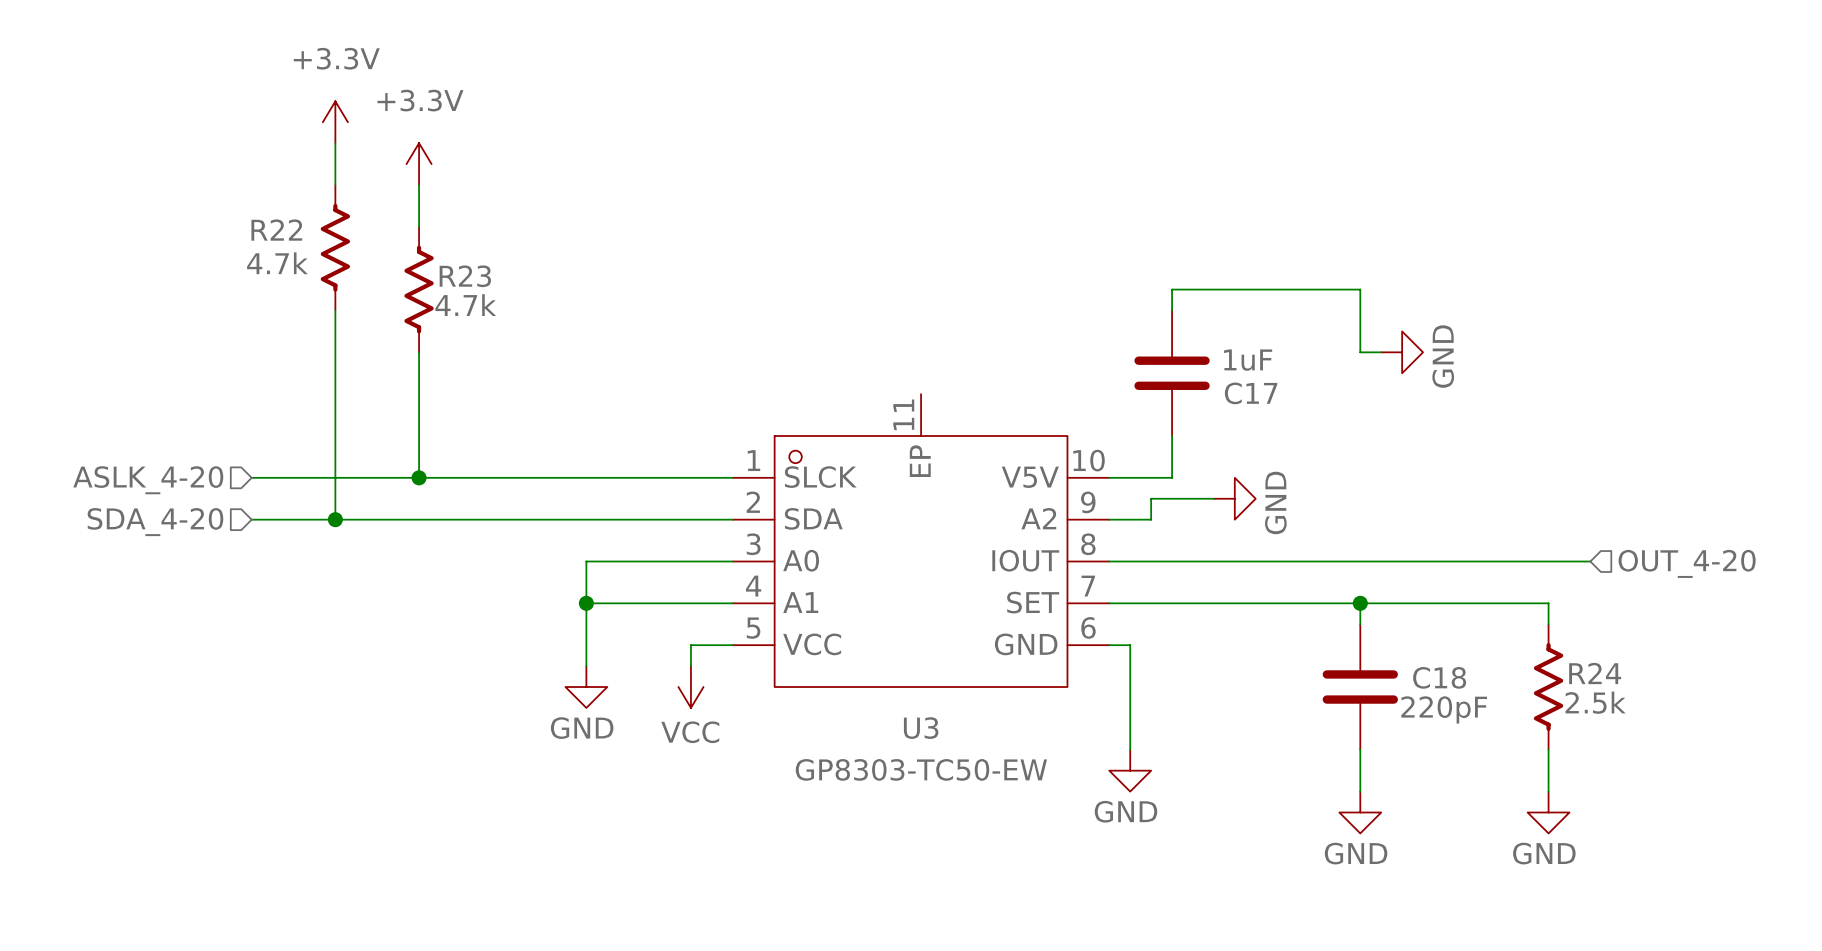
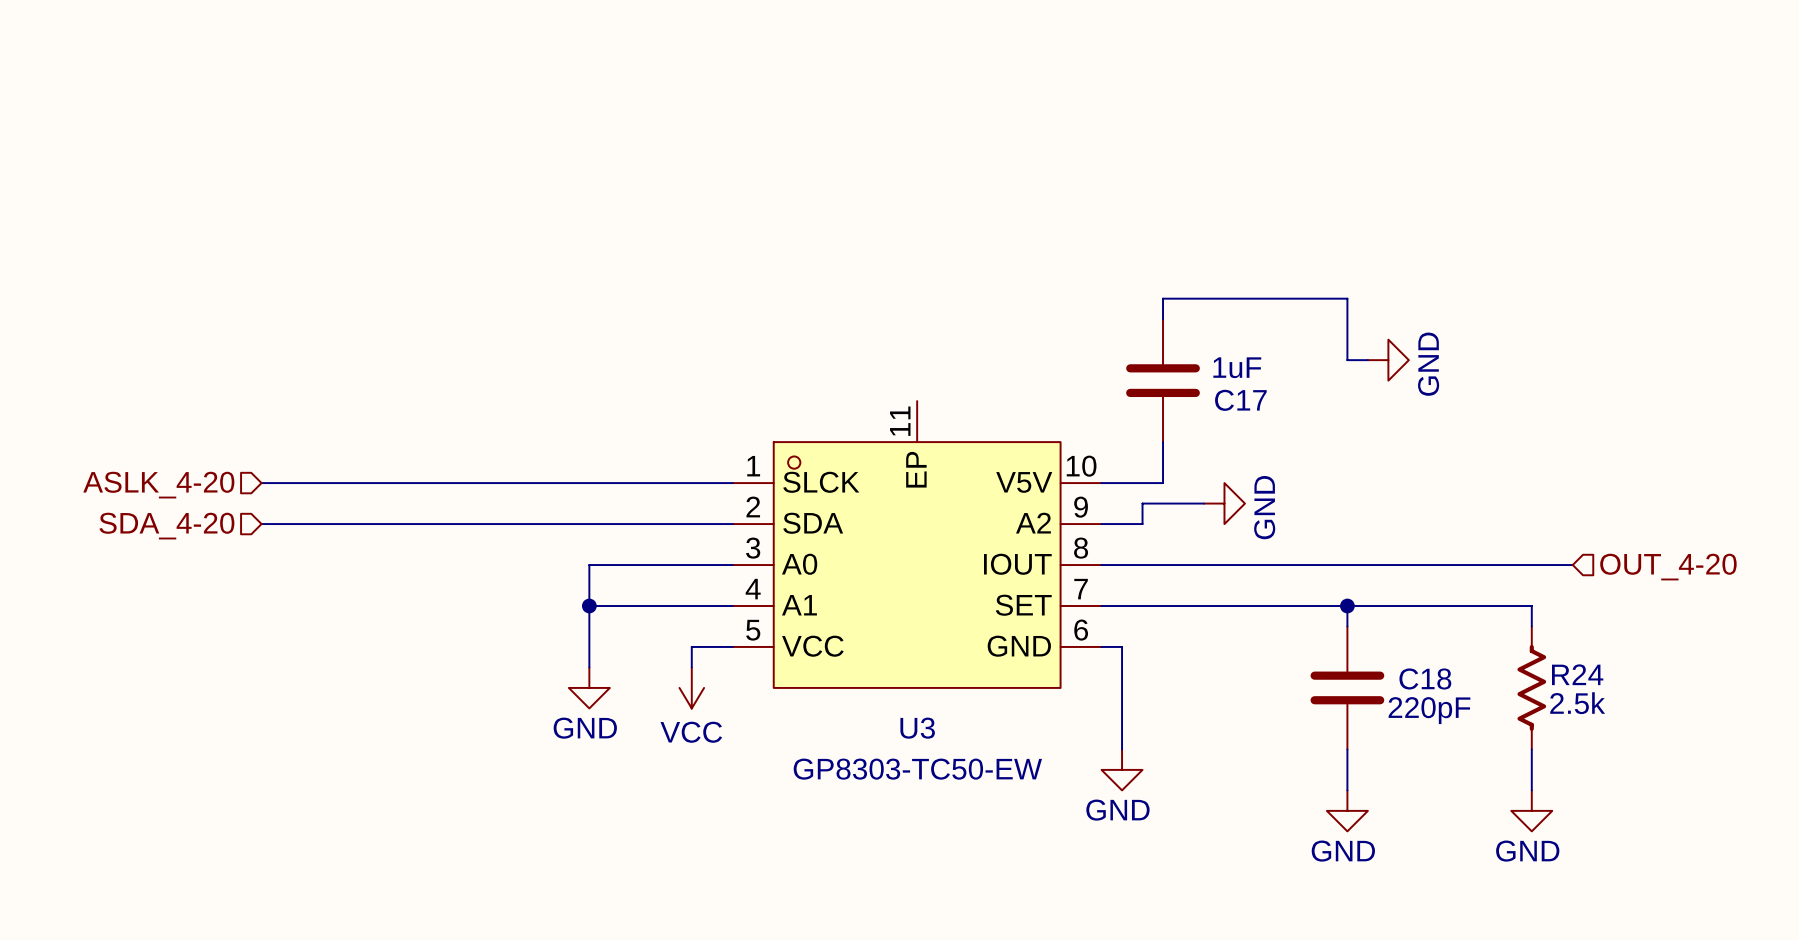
power symbol: +3.3V (335, 122) -> none
wire: (335, 143) (335, 185) -> none
power symbol: +3.3V (419, 164) -> none
wire: (419, 185) (419, 226) -> none
R22: (335, 247) -> none
R23: (419, 289) -> none
wire: (335, 310) (335, 519) -> none
wire: (419, 352) (419, 477) -> none
junction: (419, 477) -> none
junction: (335, 519) -> none

